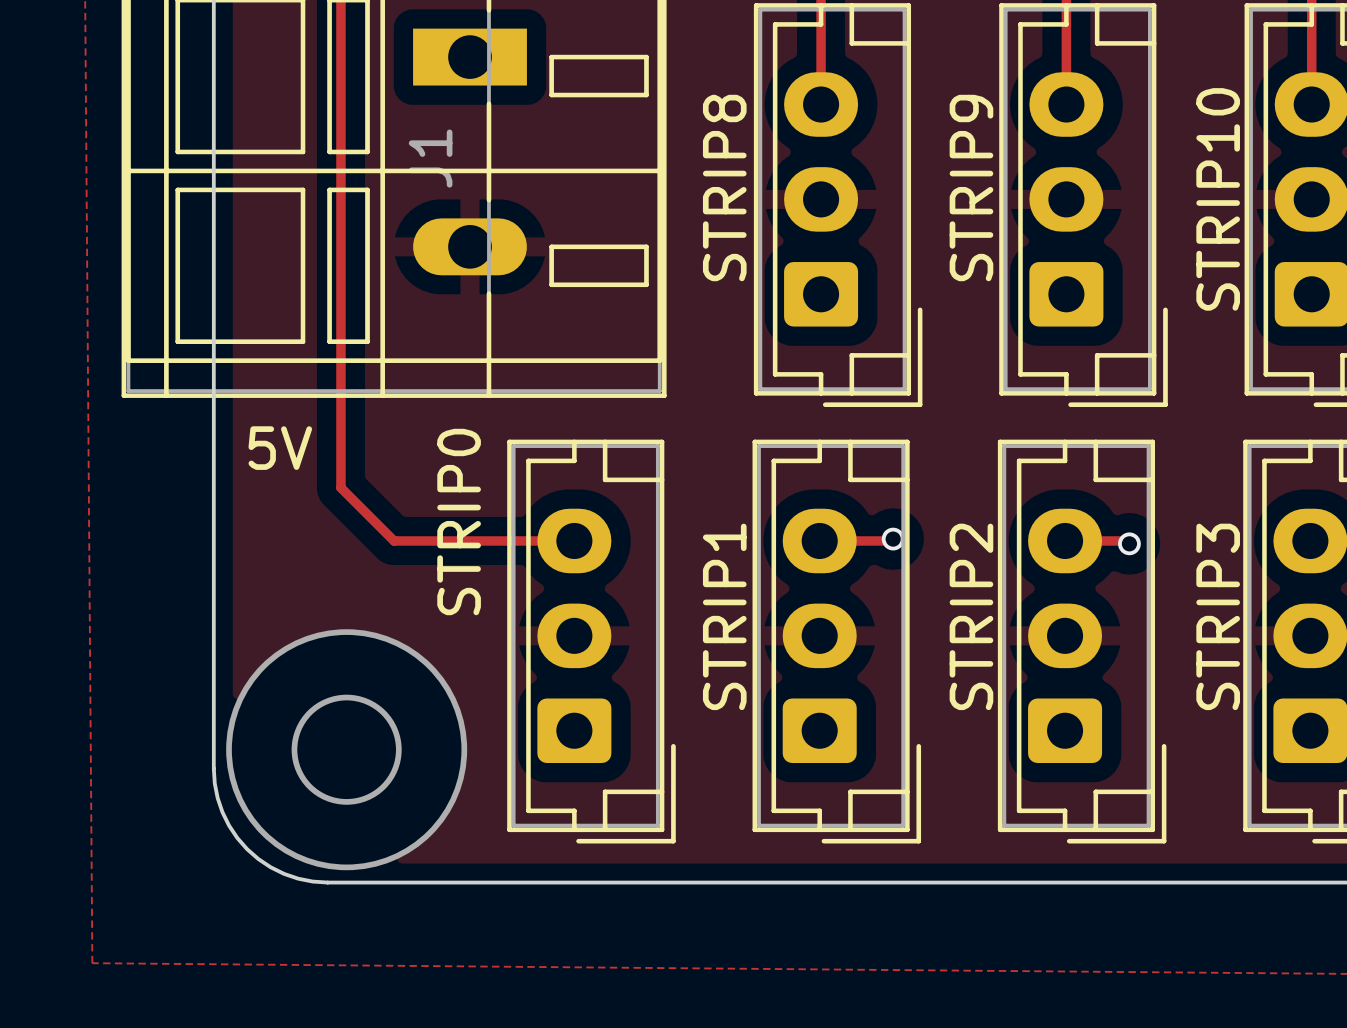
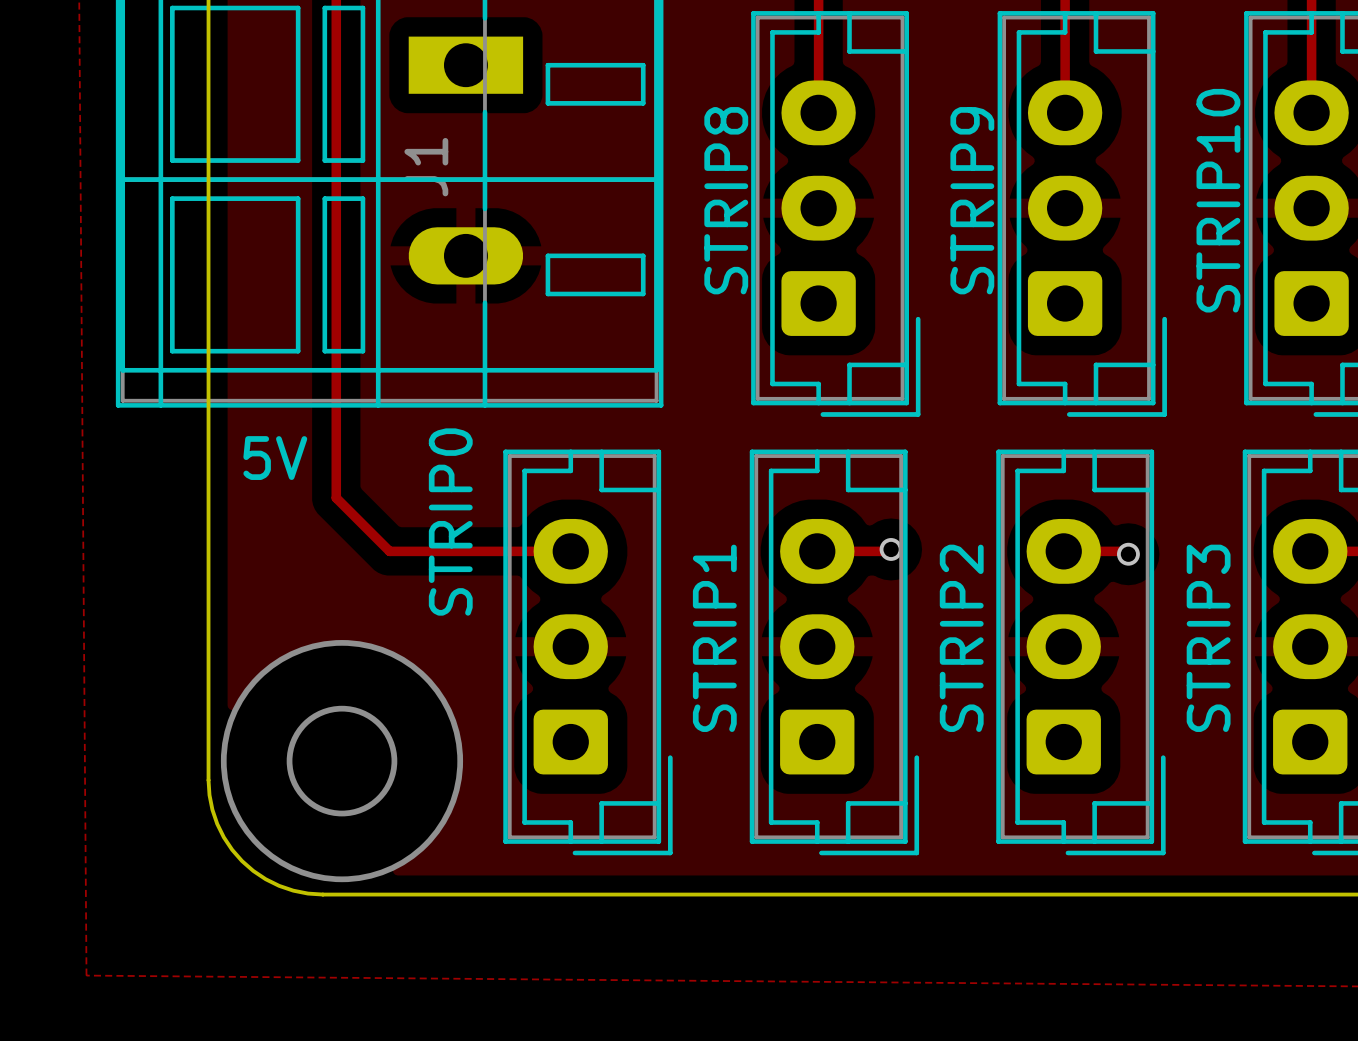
part value: STRIP8 (724, 188) -> none
part value: STRIP9 (971, 188) -> none
text: none -> STRIP8 (726, 200)
text: none -> STRIP9 (972, 200)
text: none -> STRIP10 (1218, 200)
part value: STRIP10 (1218, 199) -> none
text: none -> STRIP0 (450, 522)
part value: STRIP0 (459, 522) -> none
part value: STRIP1 (724, 616) -> none
part value: STRIP2 (971, 616) -> none
part value: STRIP3 (1218, 616) -> none
text: none -> STRIP1 (714, 638)
text: none -> STRIP2 (961, 638)
text: none -> STRIP3 (1208, 638)

